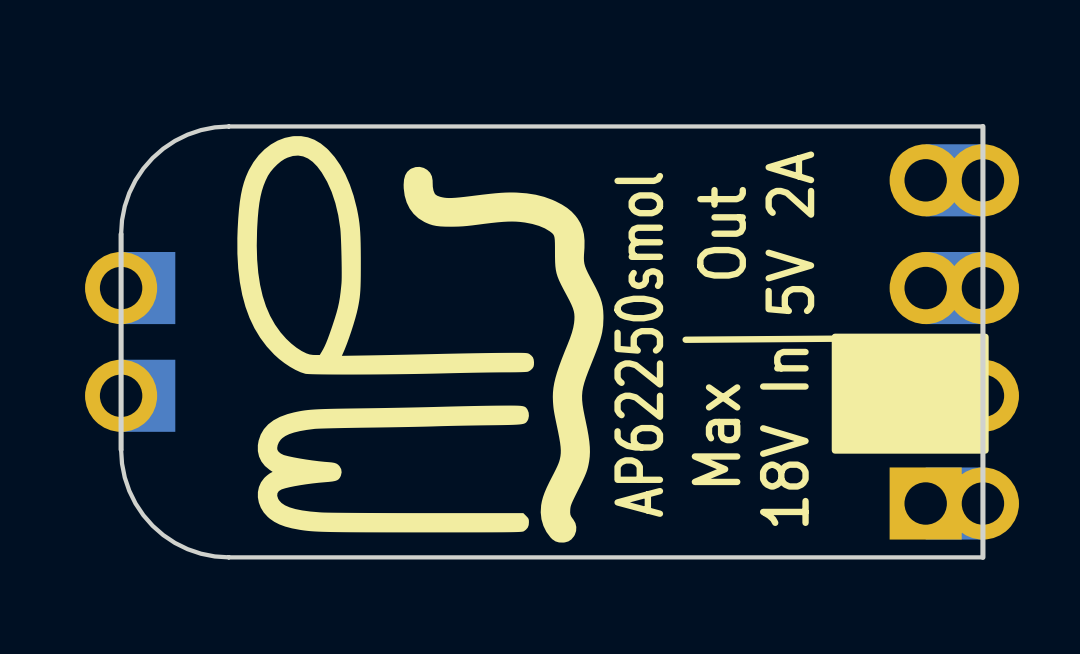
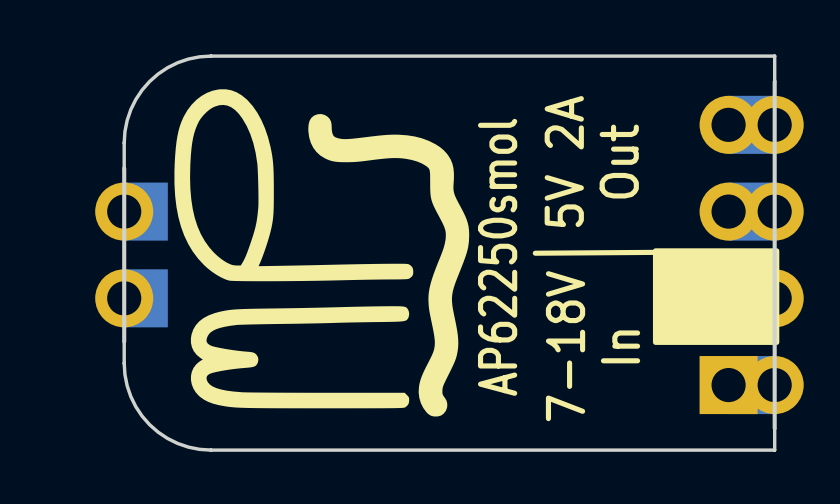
board edge: (982, 126) (214, 127) (187, 134) (163, 148) (152, 158) (135, 180) (129, 192) (124, 206) (121, 234) -> (774, 81) (774, 56) (199, 56) (167, 67) (142, 90) (127, 120) (124, 142) (124, 168)
text position: Out (721, 232) -> Out (619, 161)
text position: 5V 2A (789, 232) -> 5V 2A (564, 161)
part position: (130, 341) -> (131, 254)
text: Max (716, 434) -> 7-18V (565, 346)
text: 18V In (784, 437) -> In (620, 346)
board edge: (121, 449) (124, 477) (129, 490) (143, 515) (152, 525) (174, 542) (187, 549) (214, 556) (982, 557) -> (124, 341) (127, 385) (142, 416) (167, 438) (199, 449) (774, 450) (774, 428)

